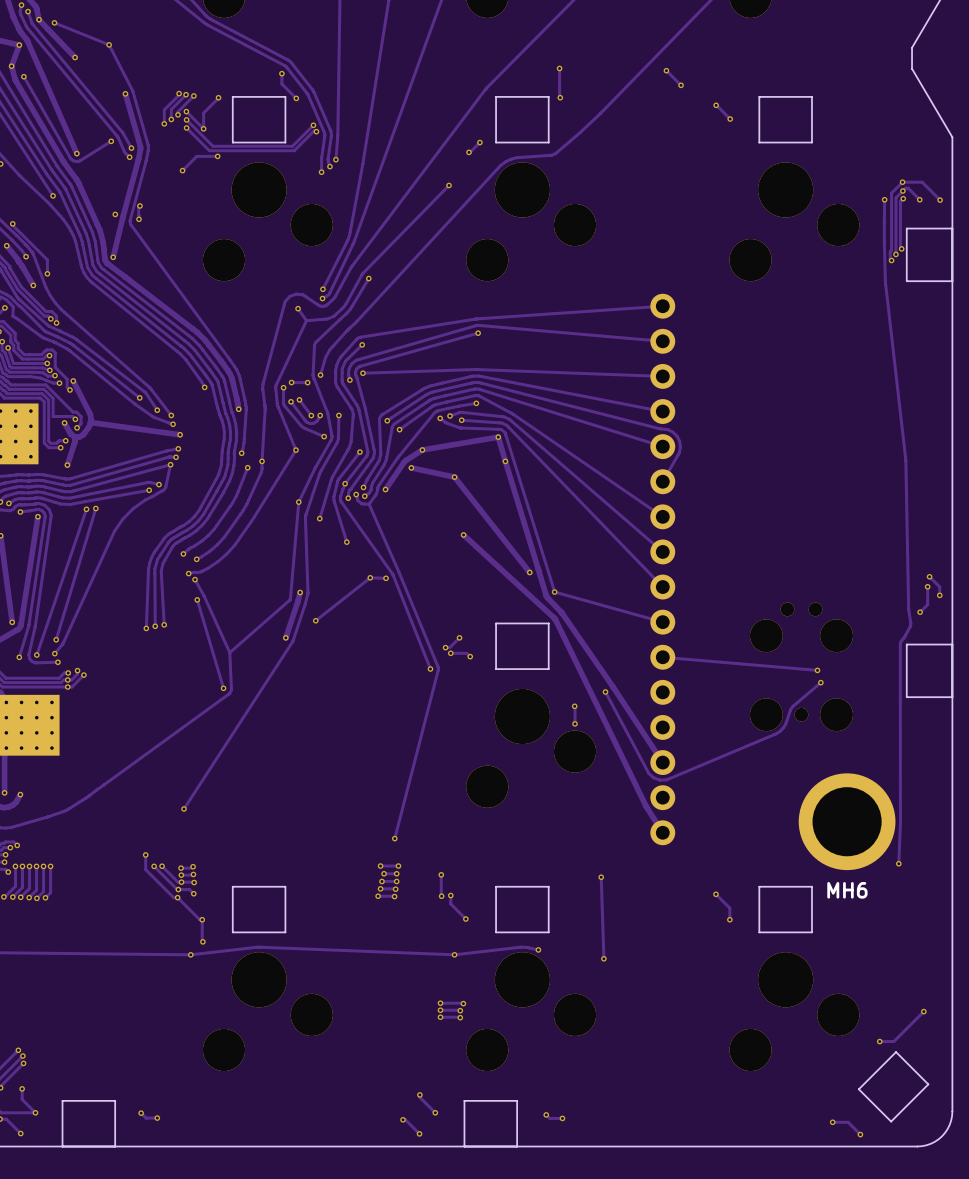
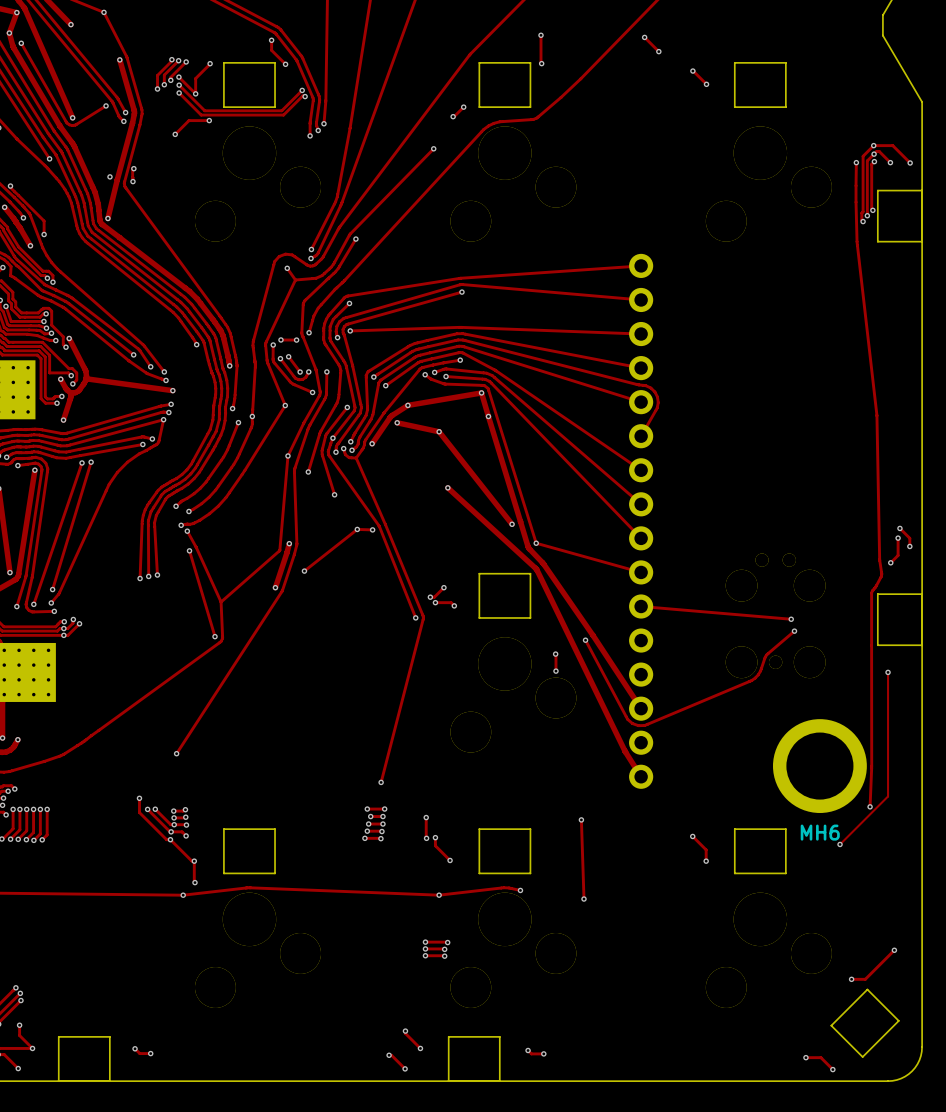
track: none -> (888, 672) (888, 796) (840, 844)
via: none -> (888, 672)
via: none -> (840, 844)

